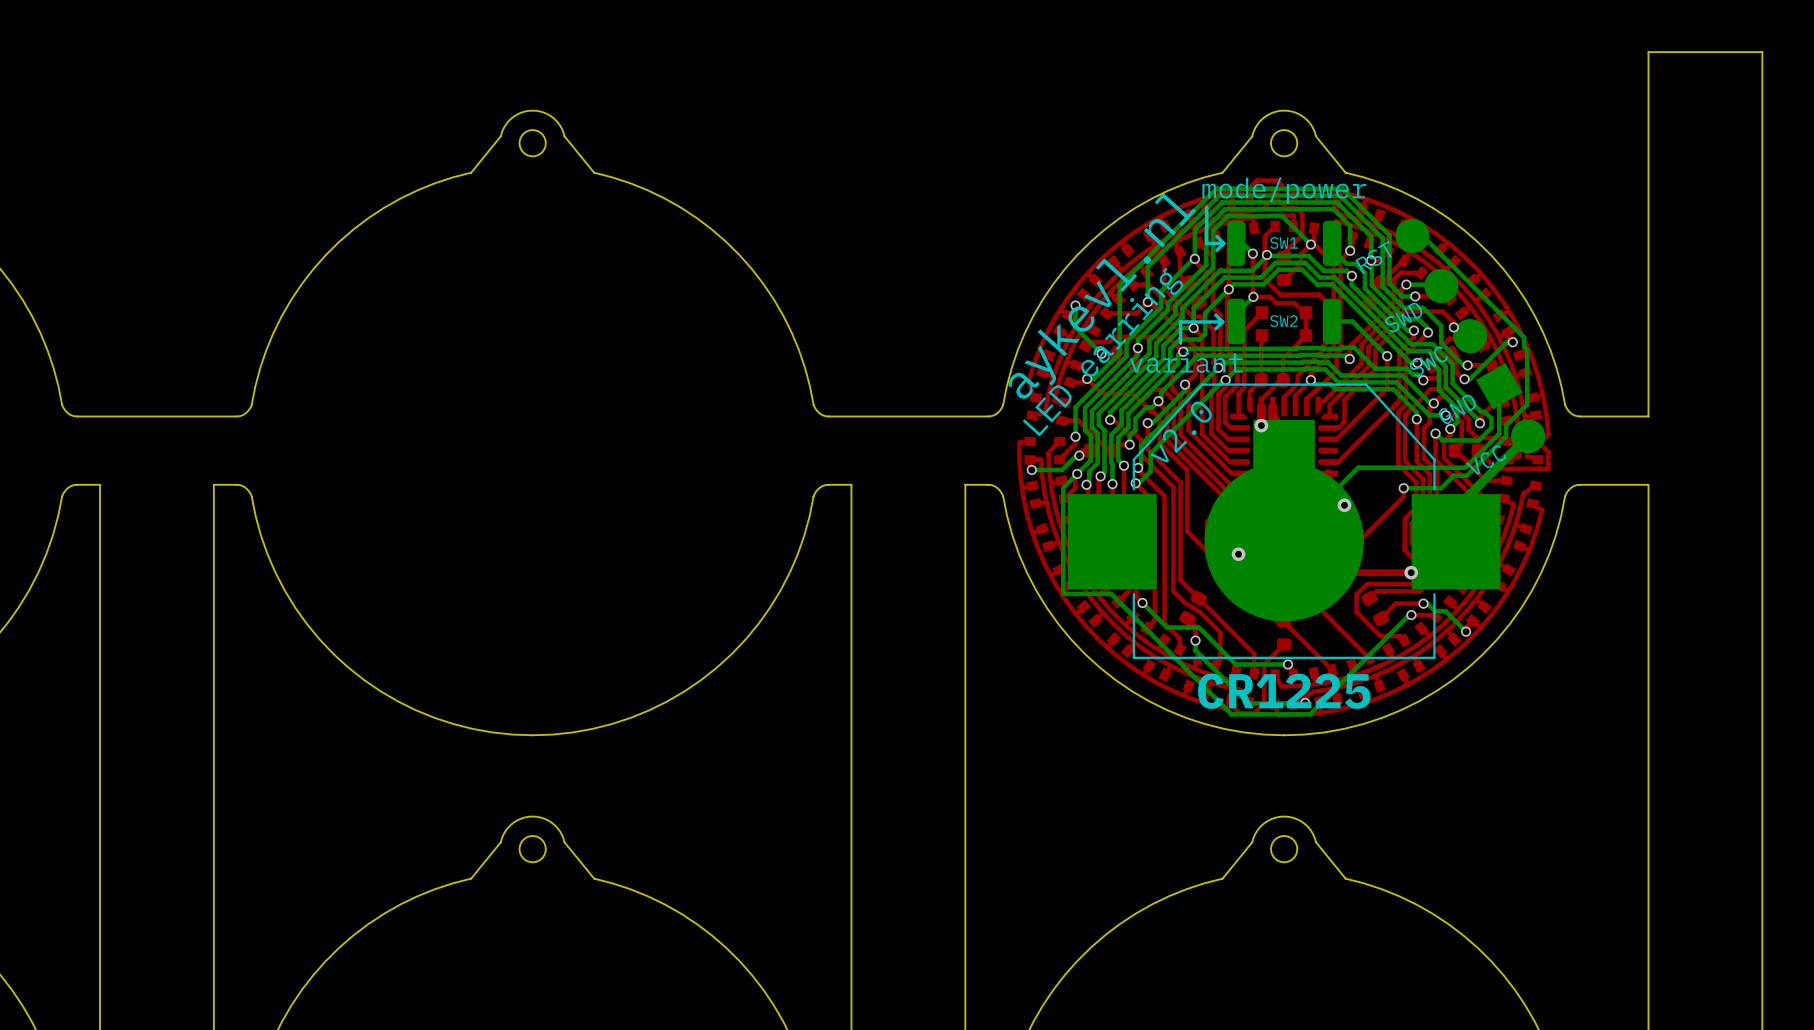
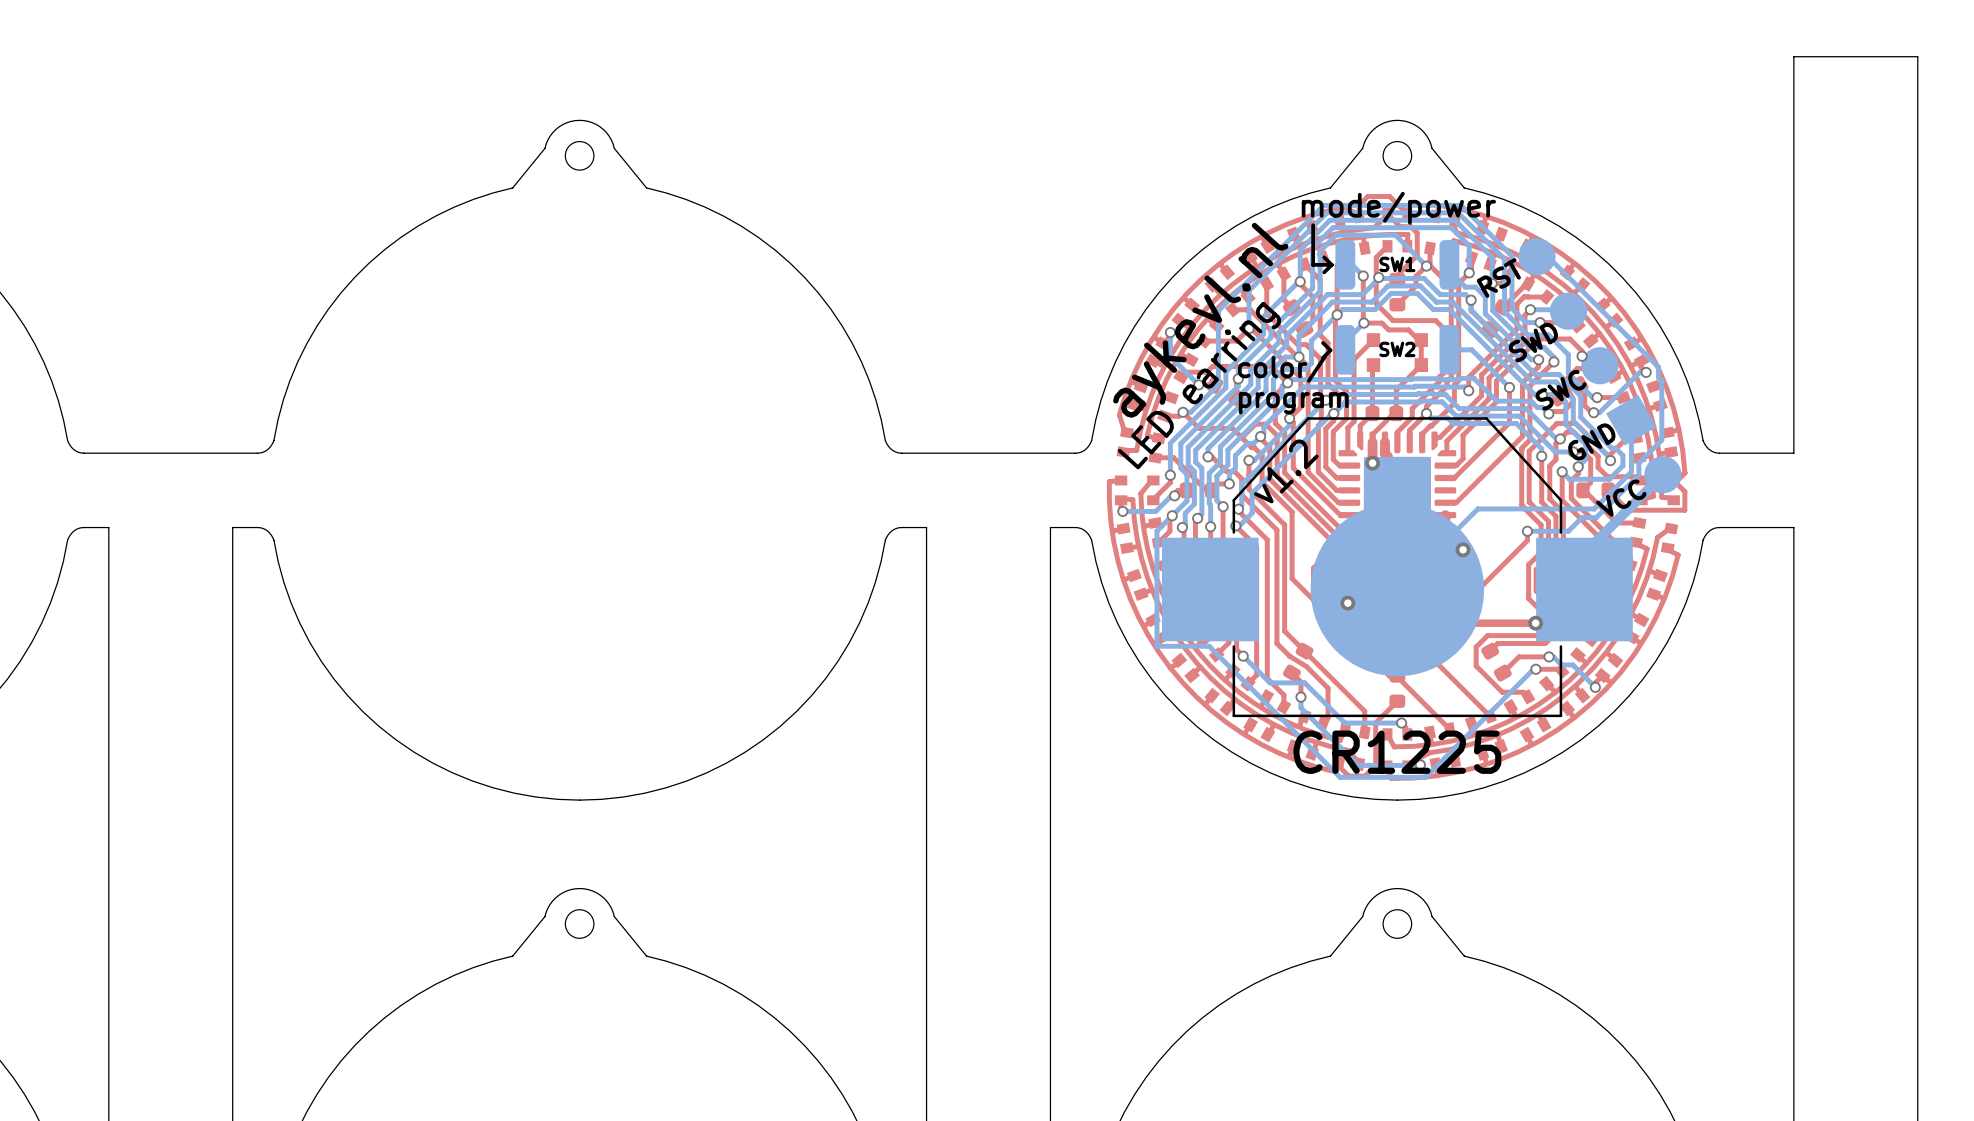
line: (1222, 321) (1180, 321) (1180, 343) -> none
text: none -> color/ (1282, 368)
text: variant (1186, 362) -> program (1293, 403)
text: v2.0 (1181, 432) -> v1.2 (1286, 471)

